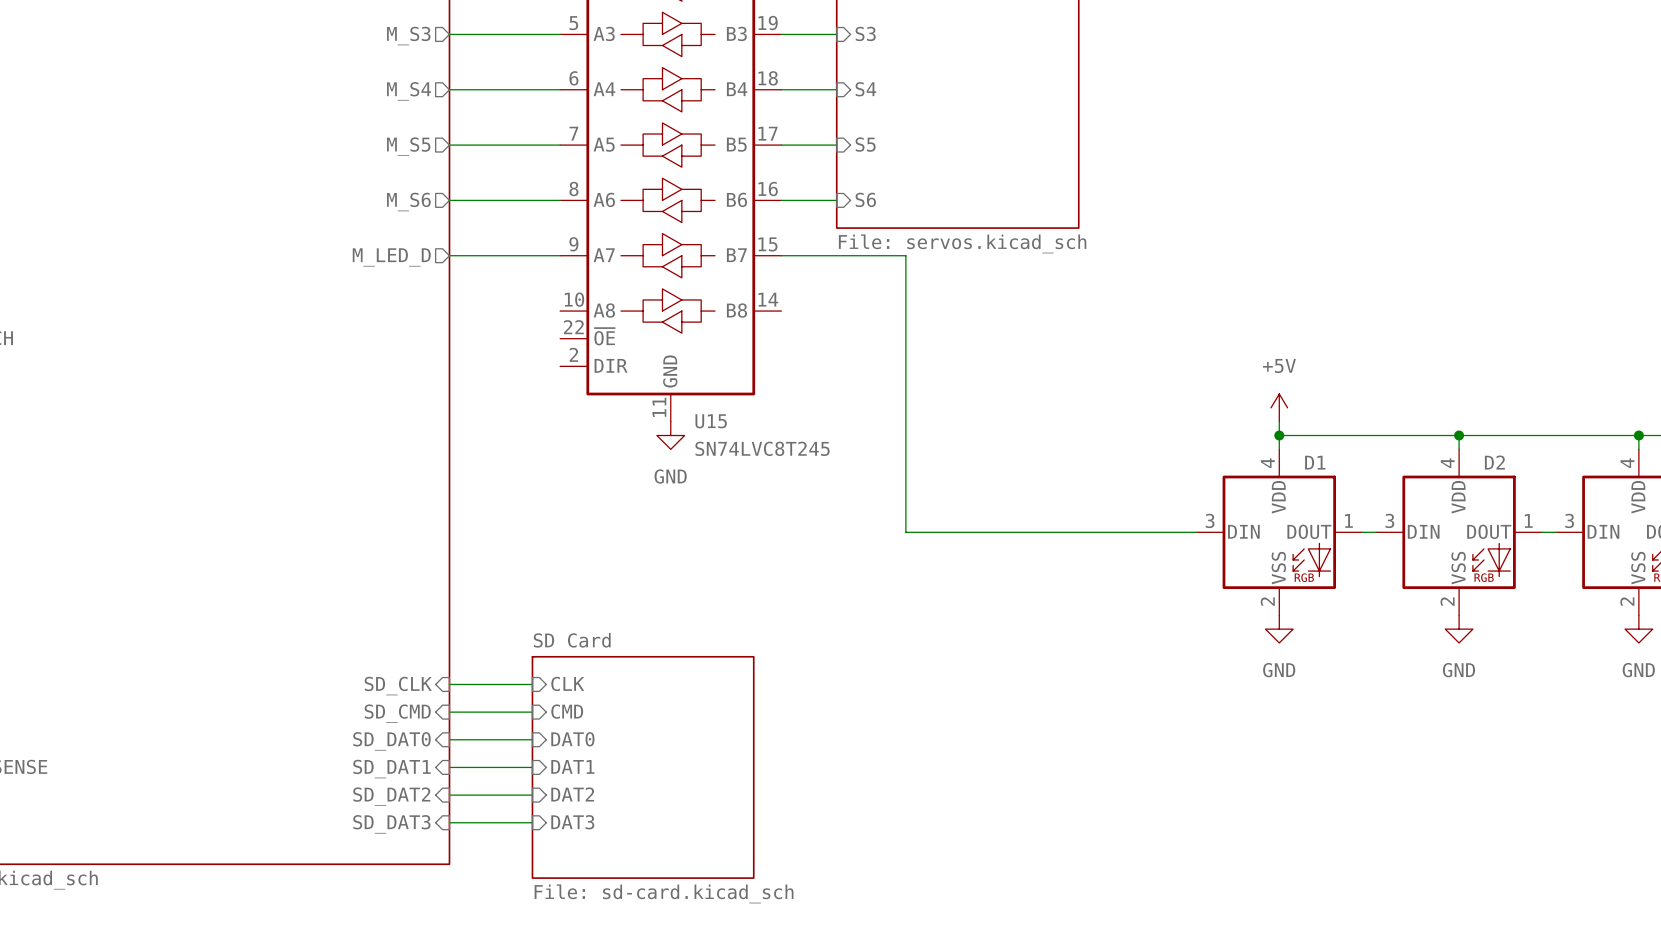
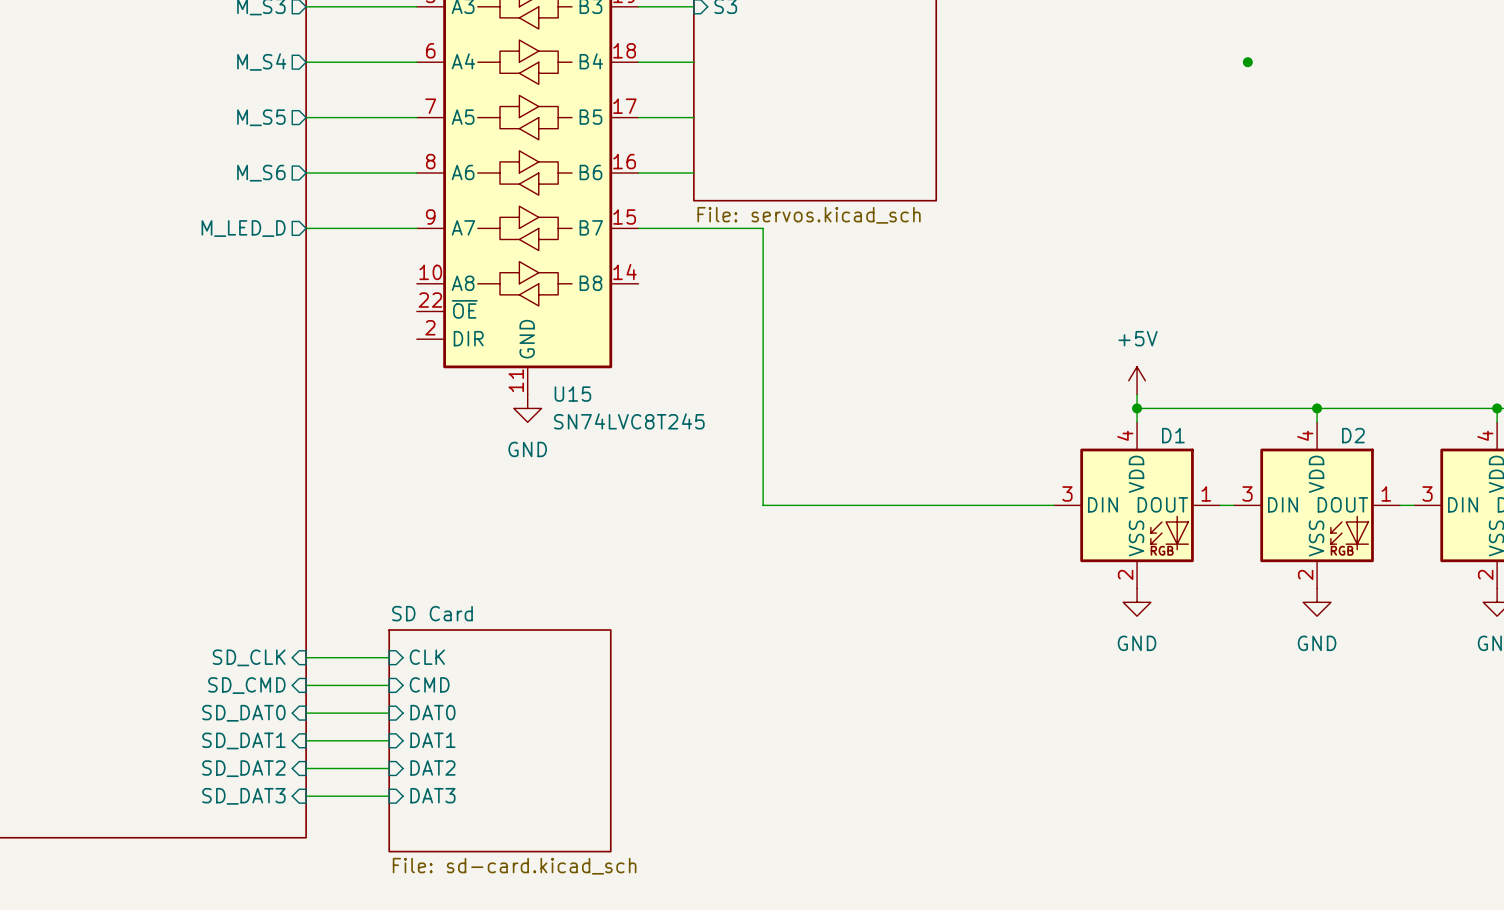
sheet pin: S4 (865, 89) -> none
junction: none -> (1247, 62)
sheet pin: S5 (865, 144) -> none
sheet pin: S6 (865, 199) -> none

